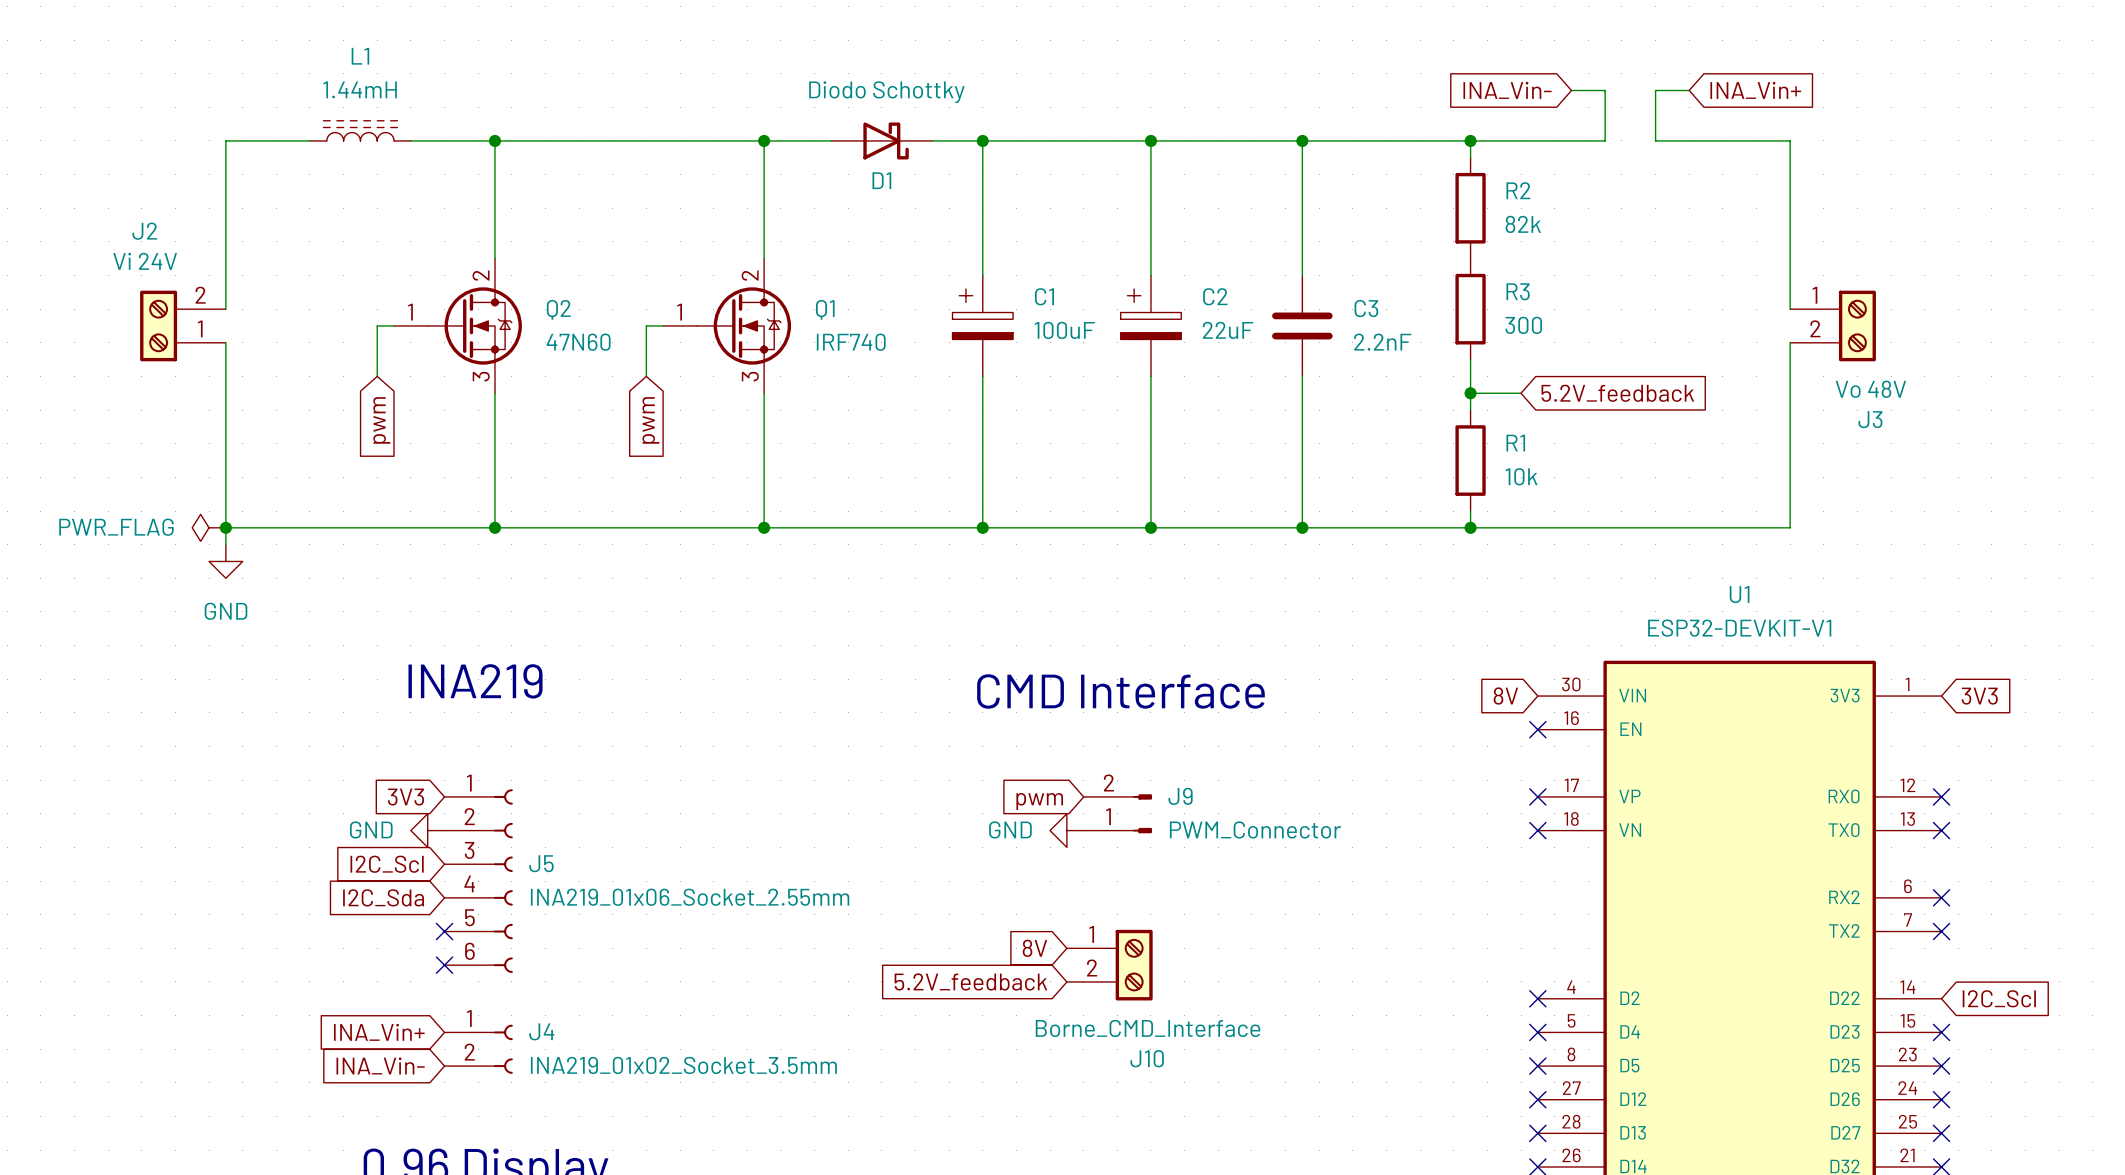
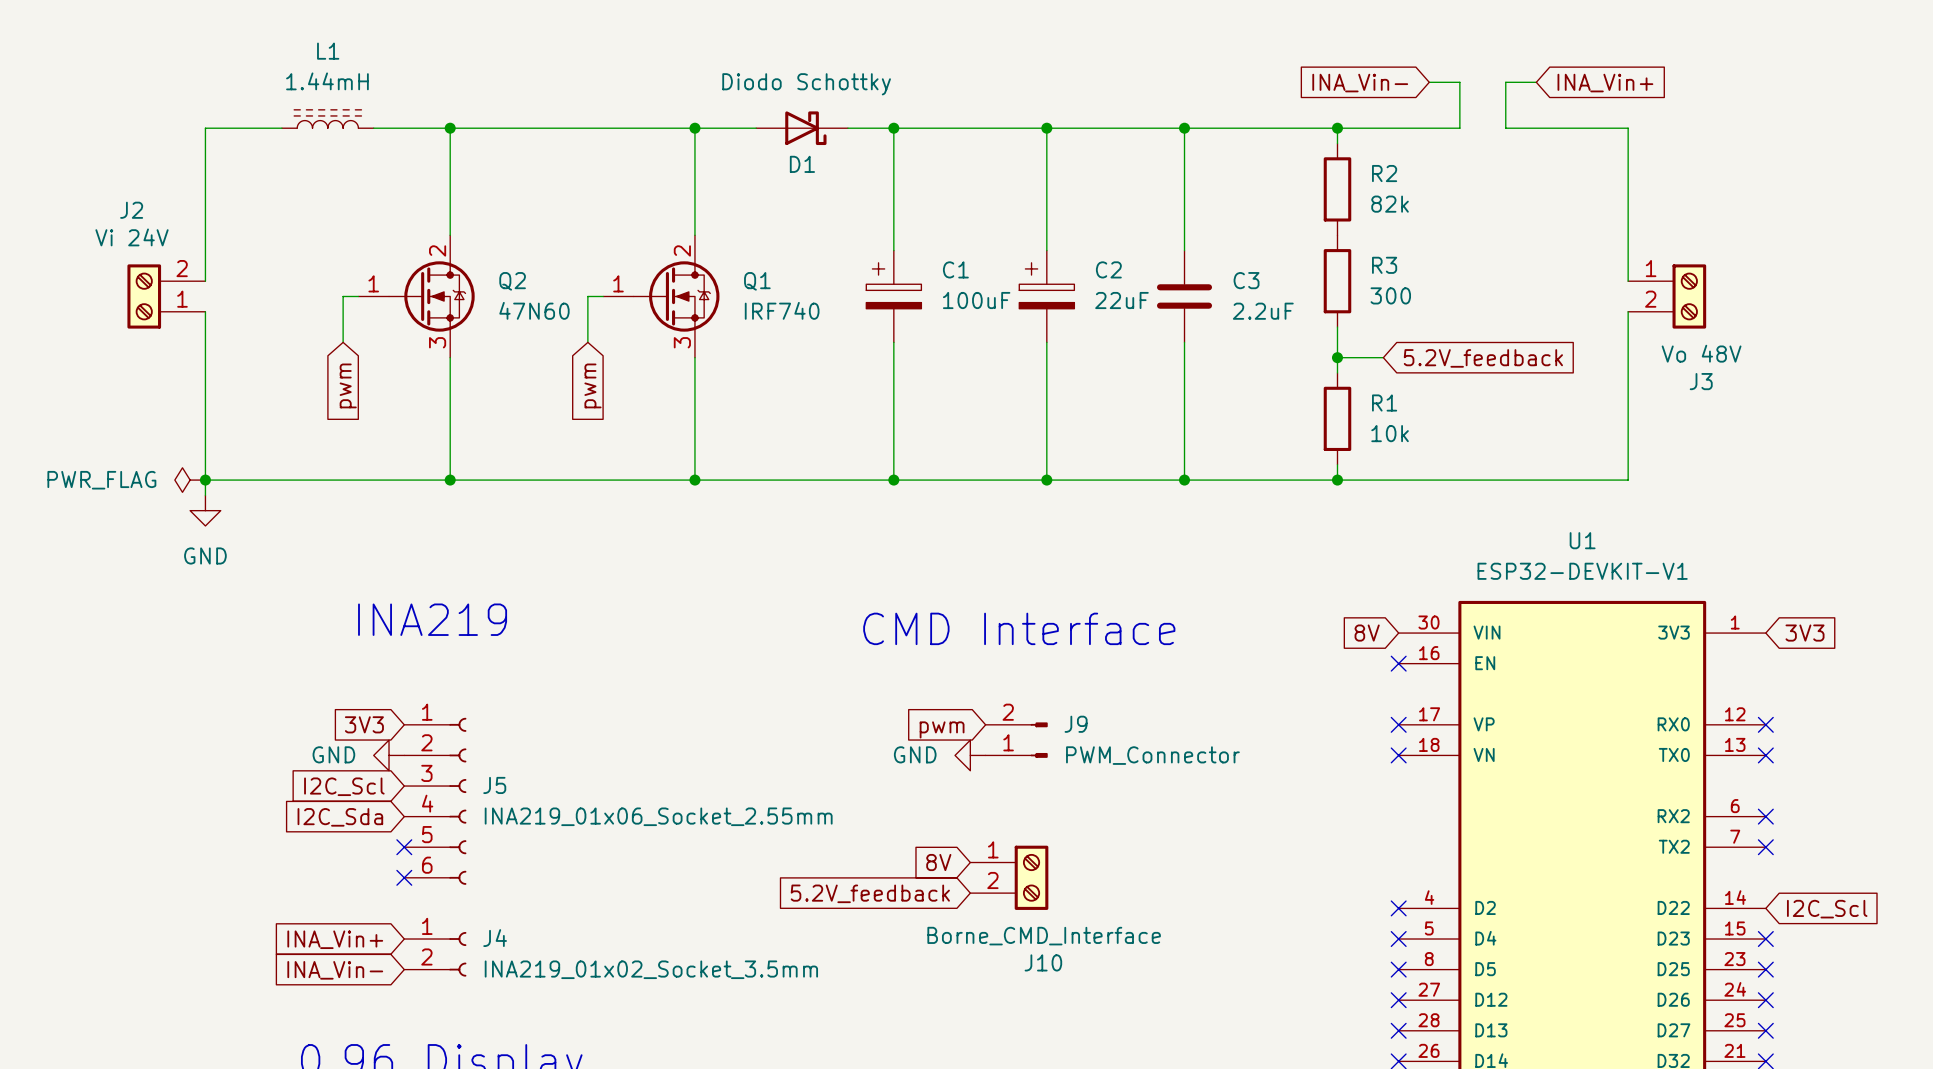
C3 value: 2.2nF (1382, 342) -> 2.2uF (1263, 311)

